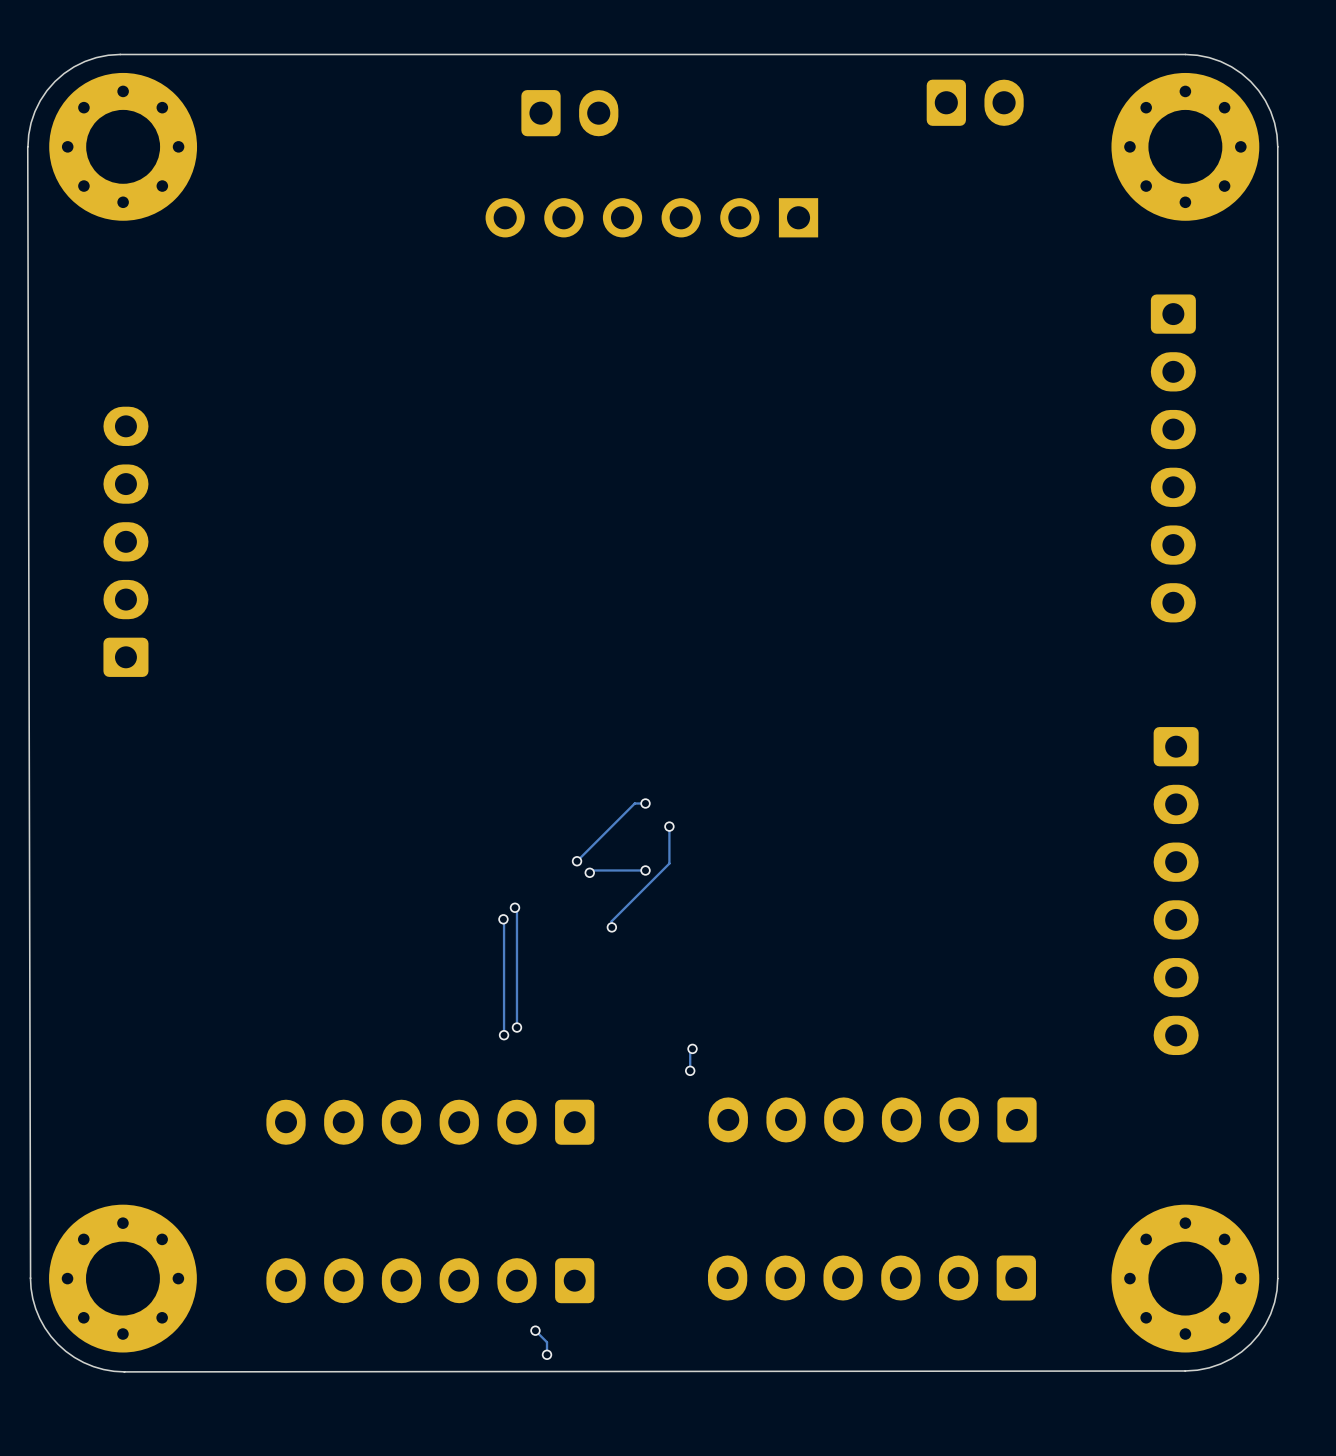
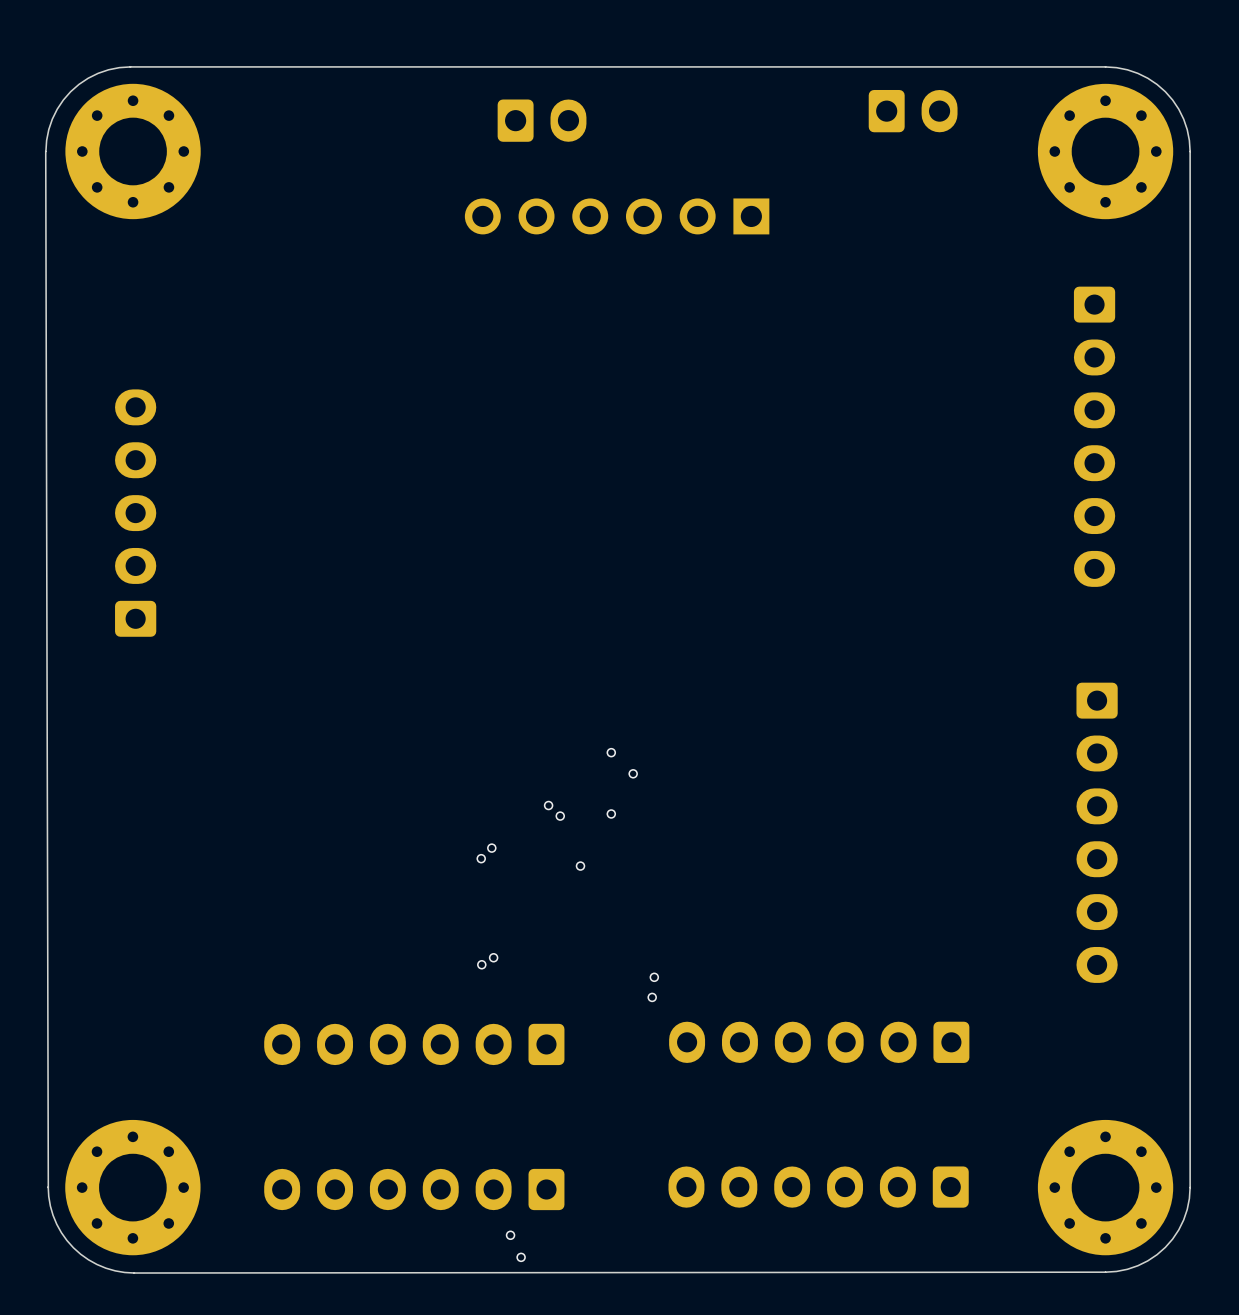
track: (645, 803) (634, 803) (577, 861) -> none
track: (669, 826) (669, 863) (611, 921) (611, 927) -> none
track: (645, 870) (592, 870) (589, 872) -> none
track: (514, 907) (516, 909) (516, 1027) -> none
track: (503, 919) (504, 1035) -> none
track: (692, 1048) (690, 1051) (690, 1070) -> none
track: (535, 1330) (547, 1342) (547, 1354) -> none

